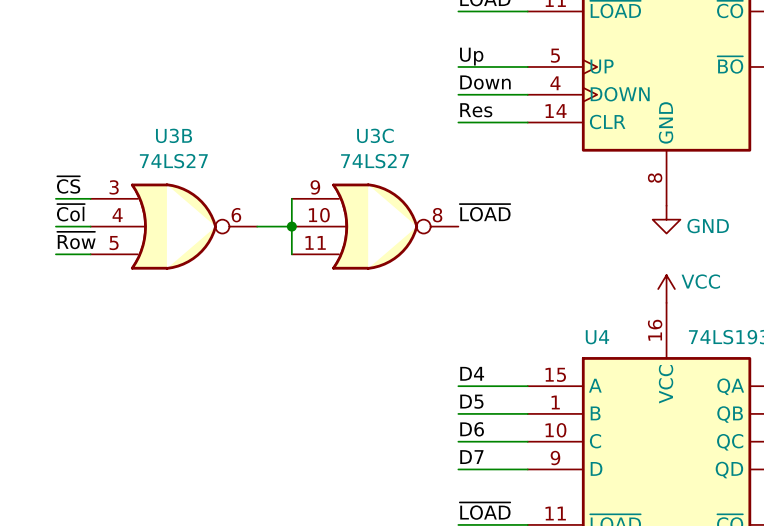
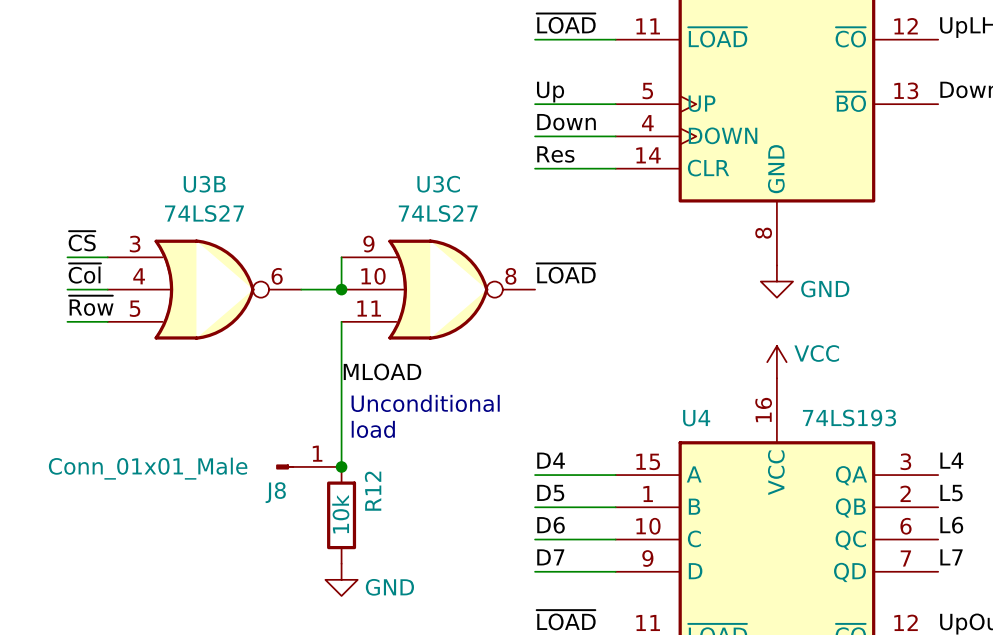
wire: (291, 226) (291, 254) -> (341, 466) (341, 321)
label: none -> MLOAD (382, 371)
text: none -> Unconditional (425, 403)
text: none -> load (373, 429)
J8: none -> Conn_01x01_Male (308, 466)
junction: none -> (341, 466)
R12: none -> 10k (341, 515)
power symbol: none -> GND (341, 579)

